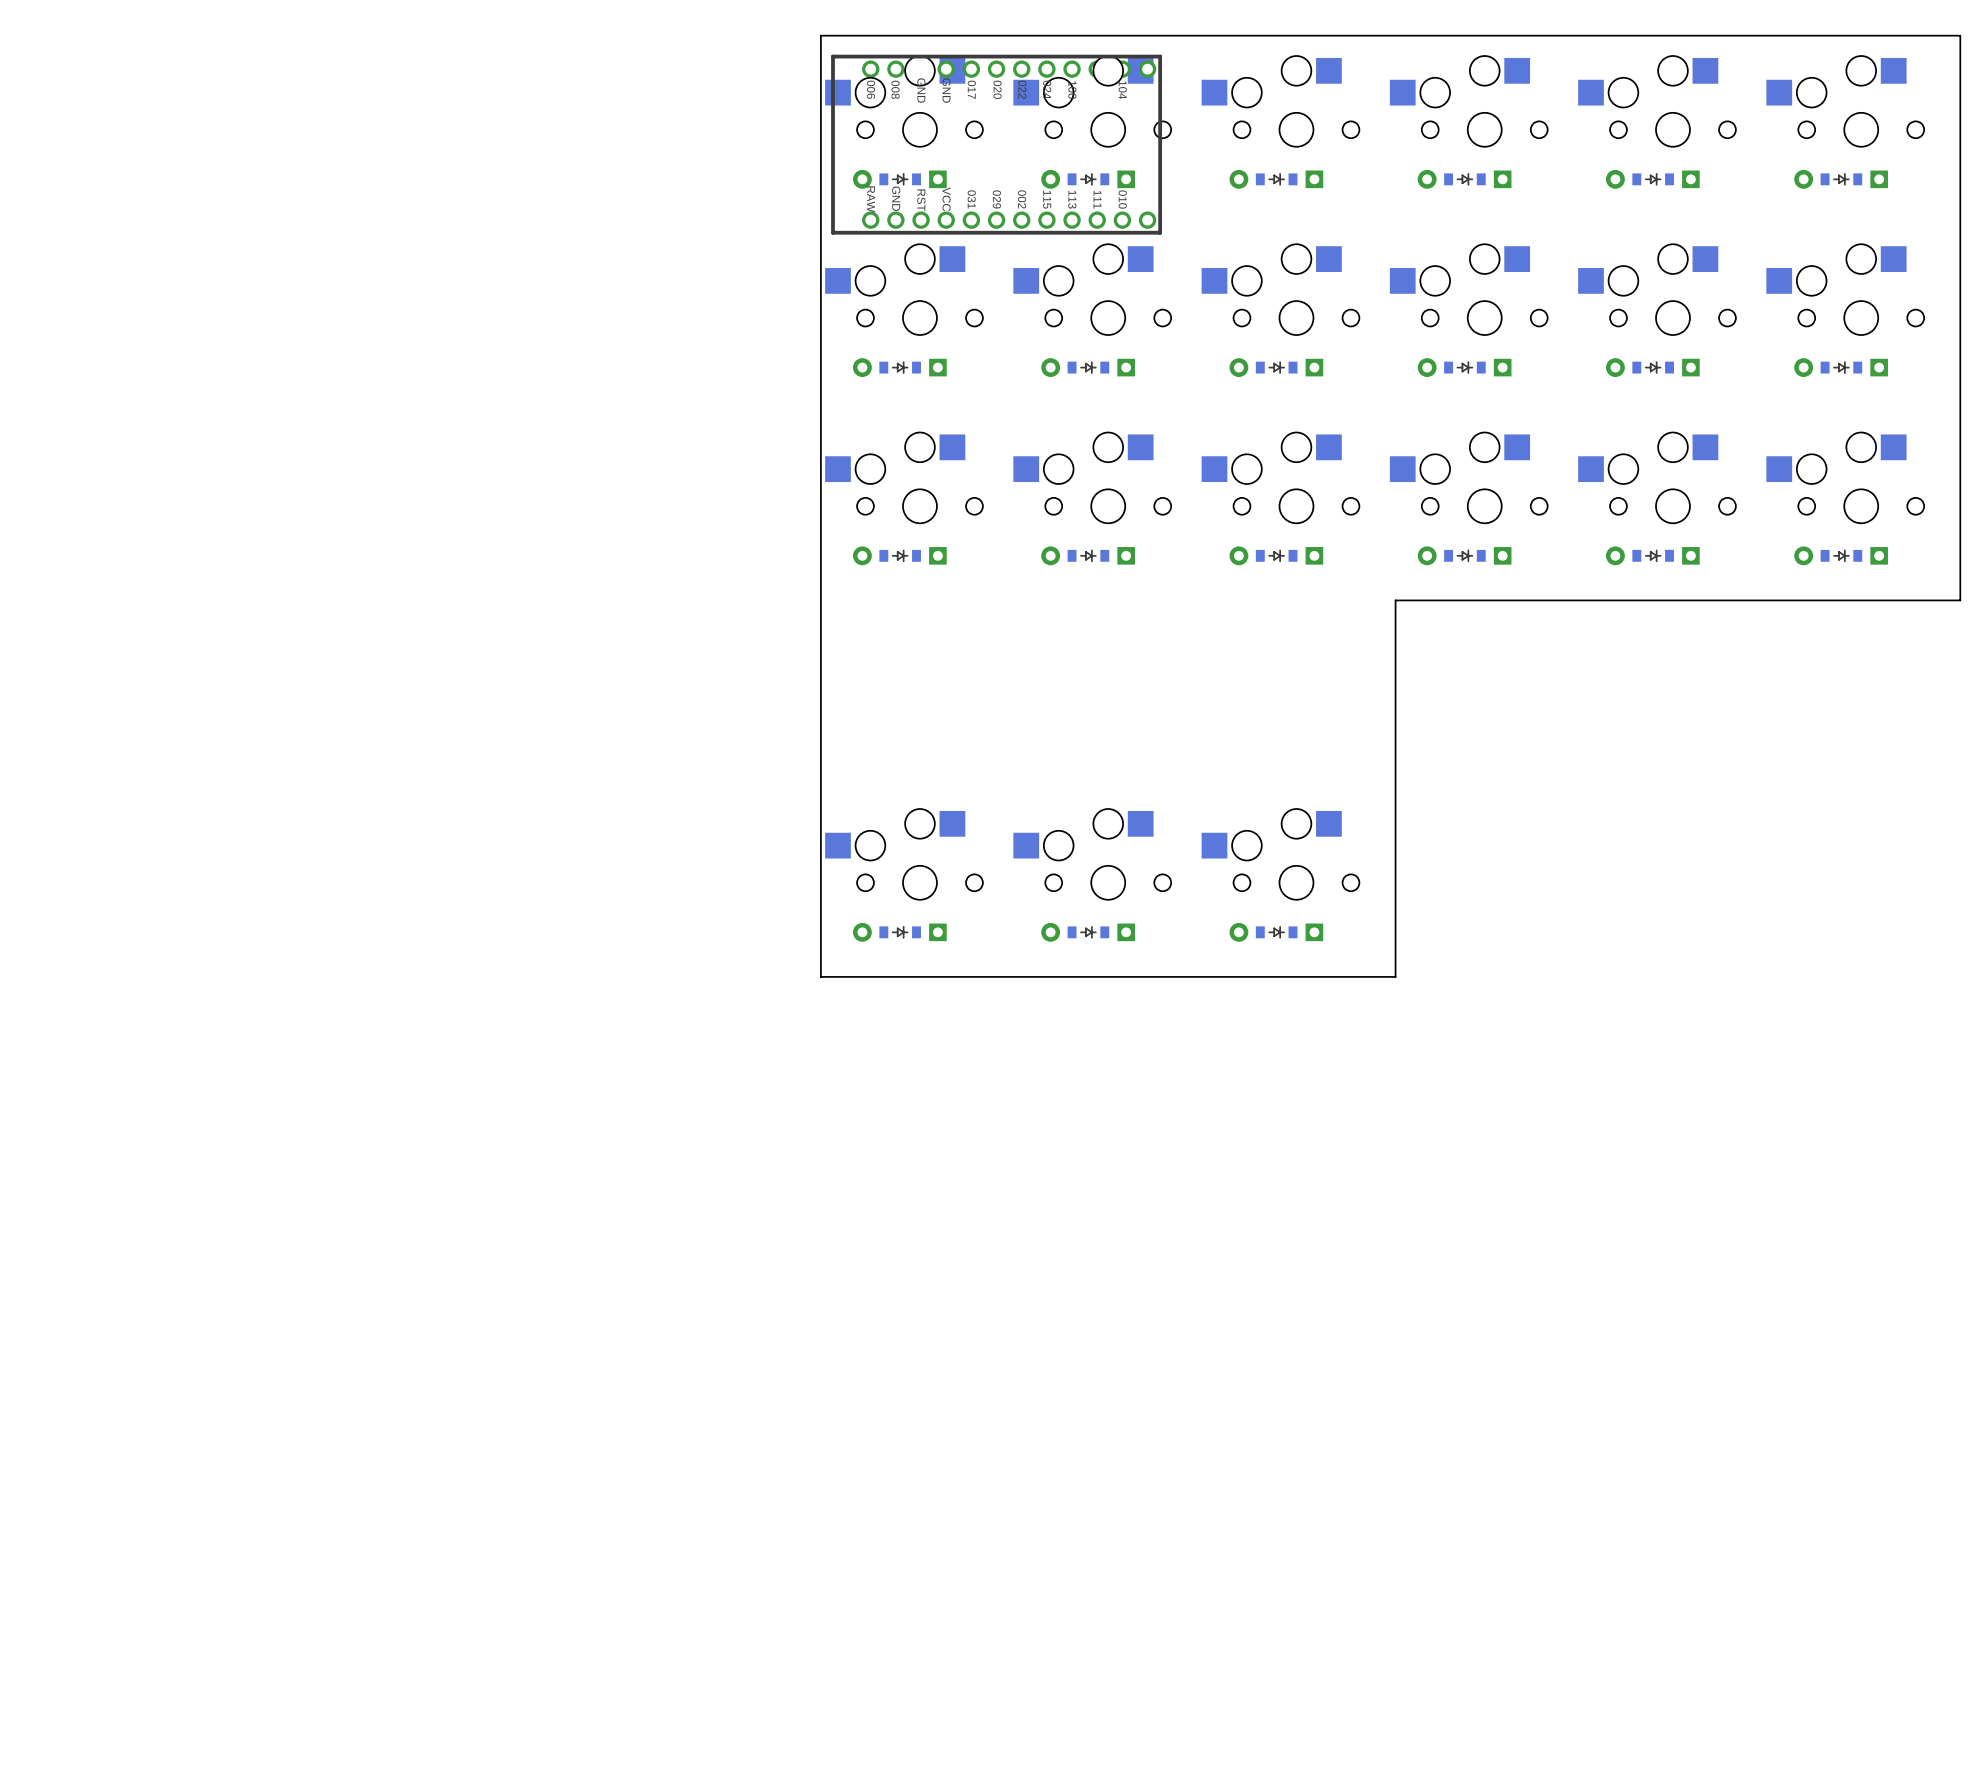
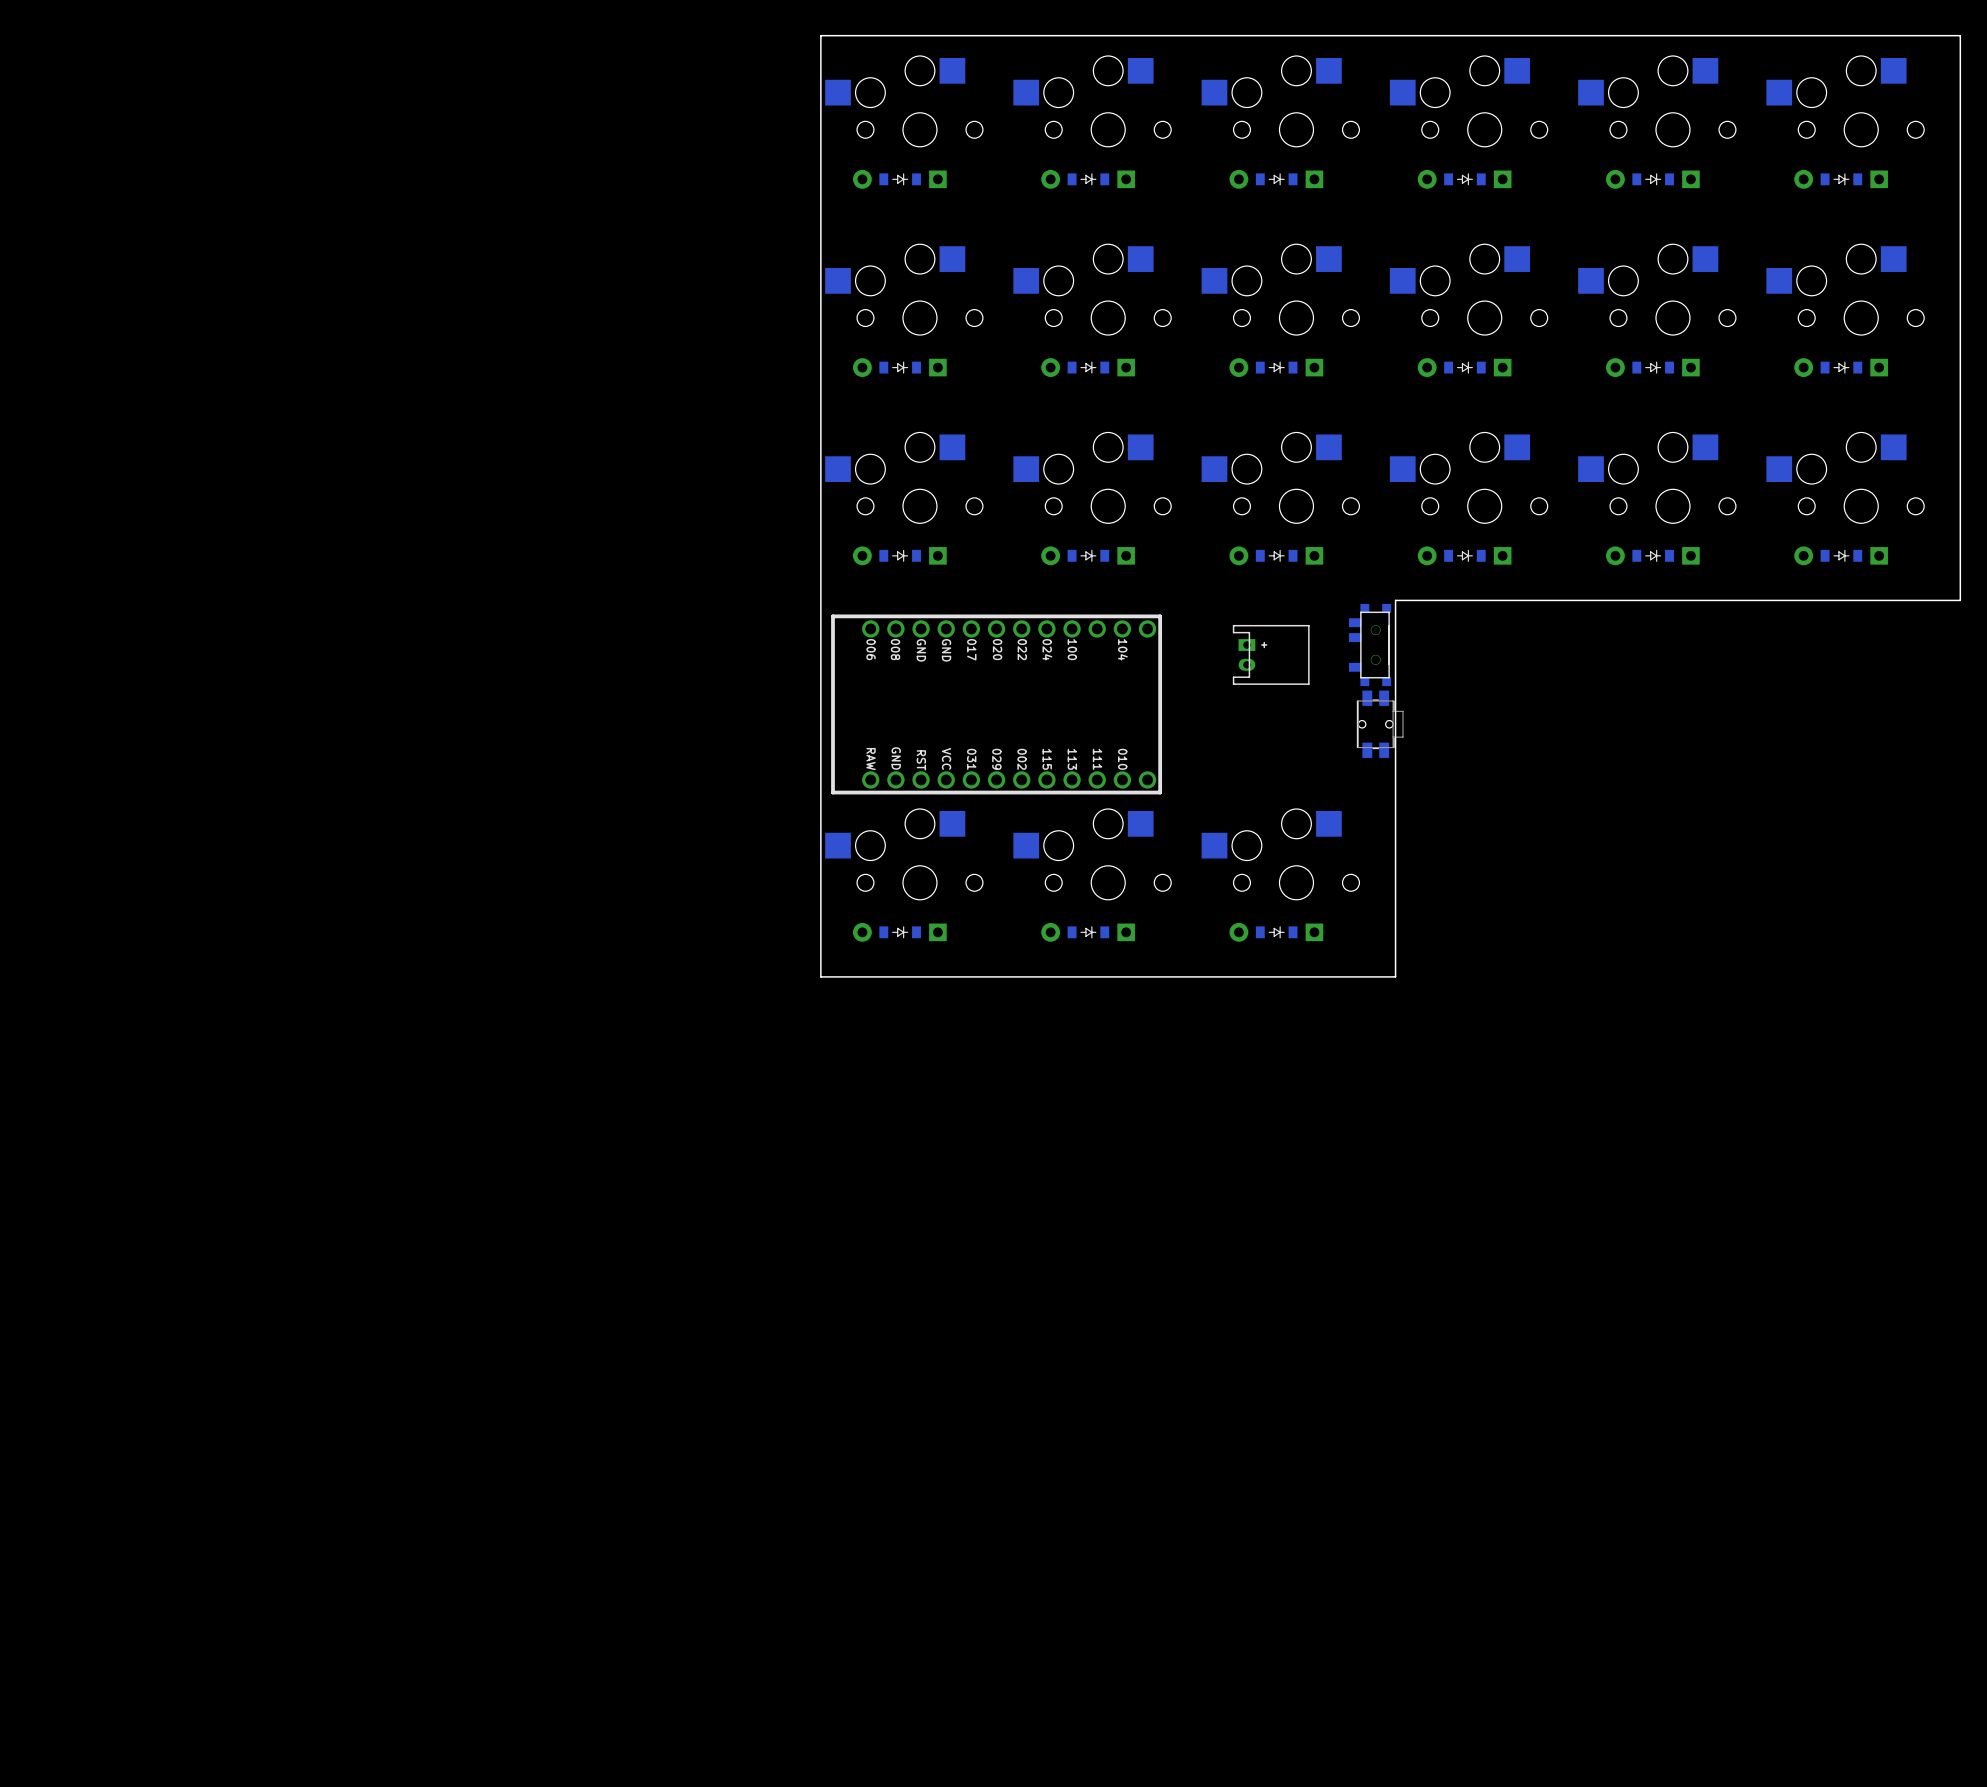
part: (996, 144) -> none
part: none -> (1370, 645)
part: none -> (1271, 654)
part: none -> (996, 704)
part: none -> (1380, 724)

